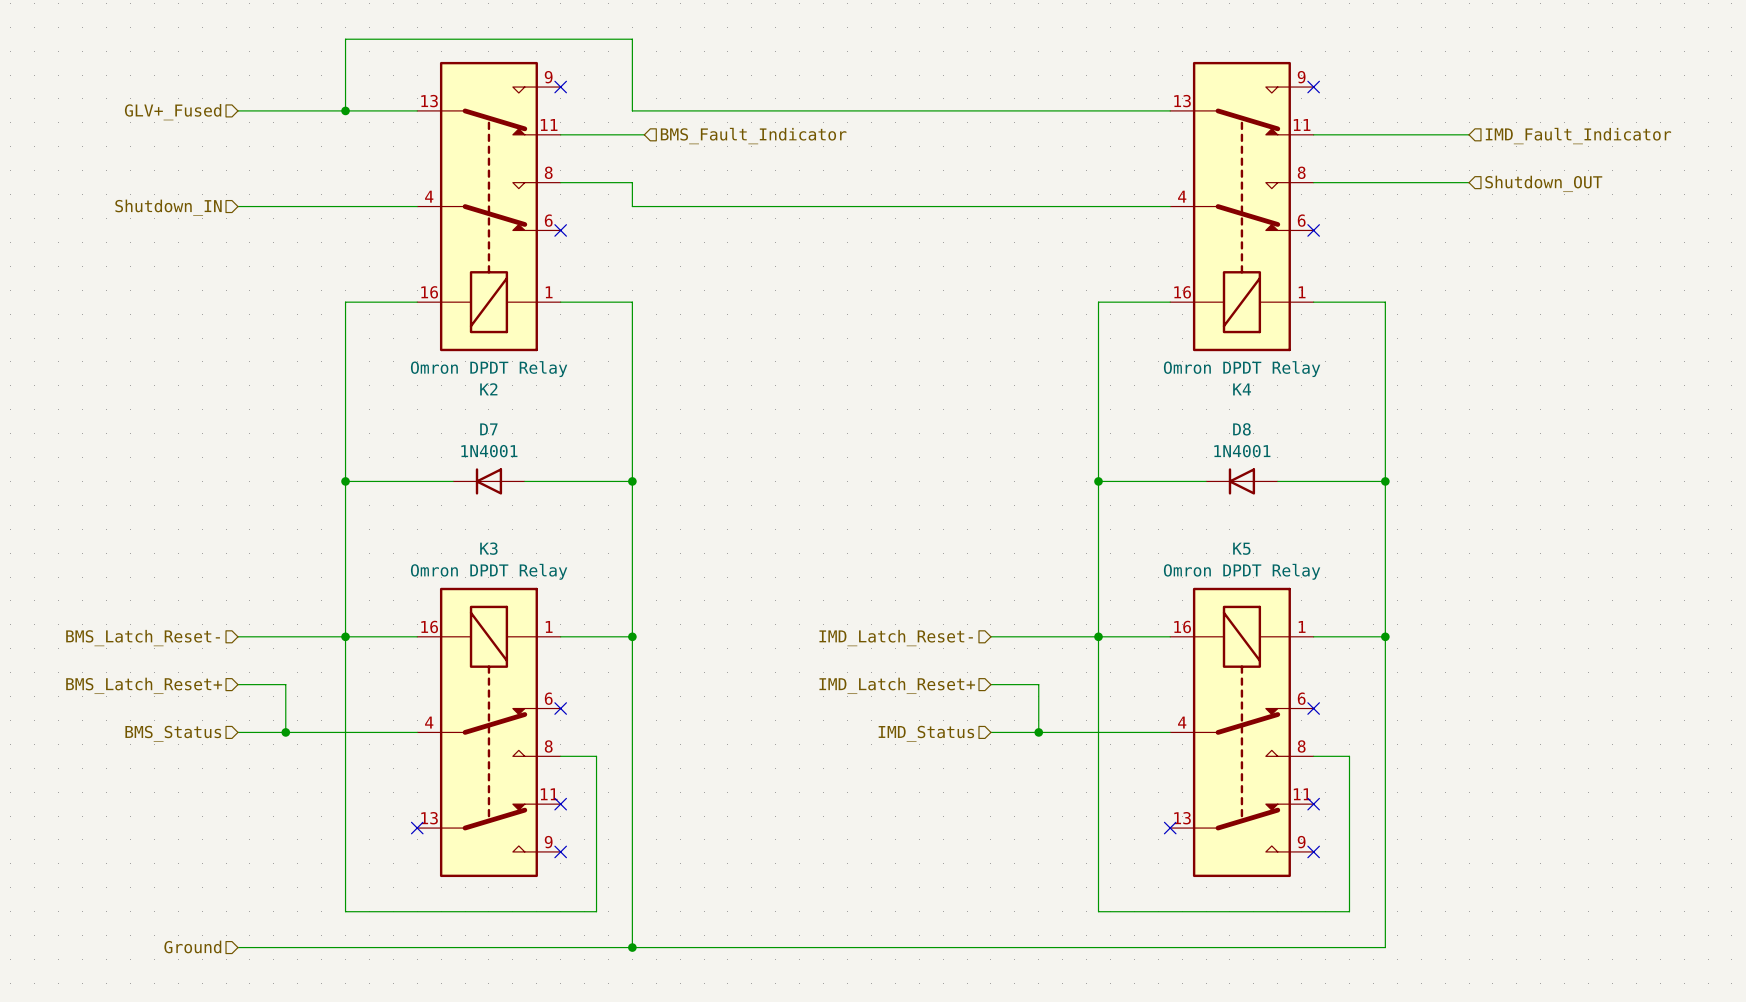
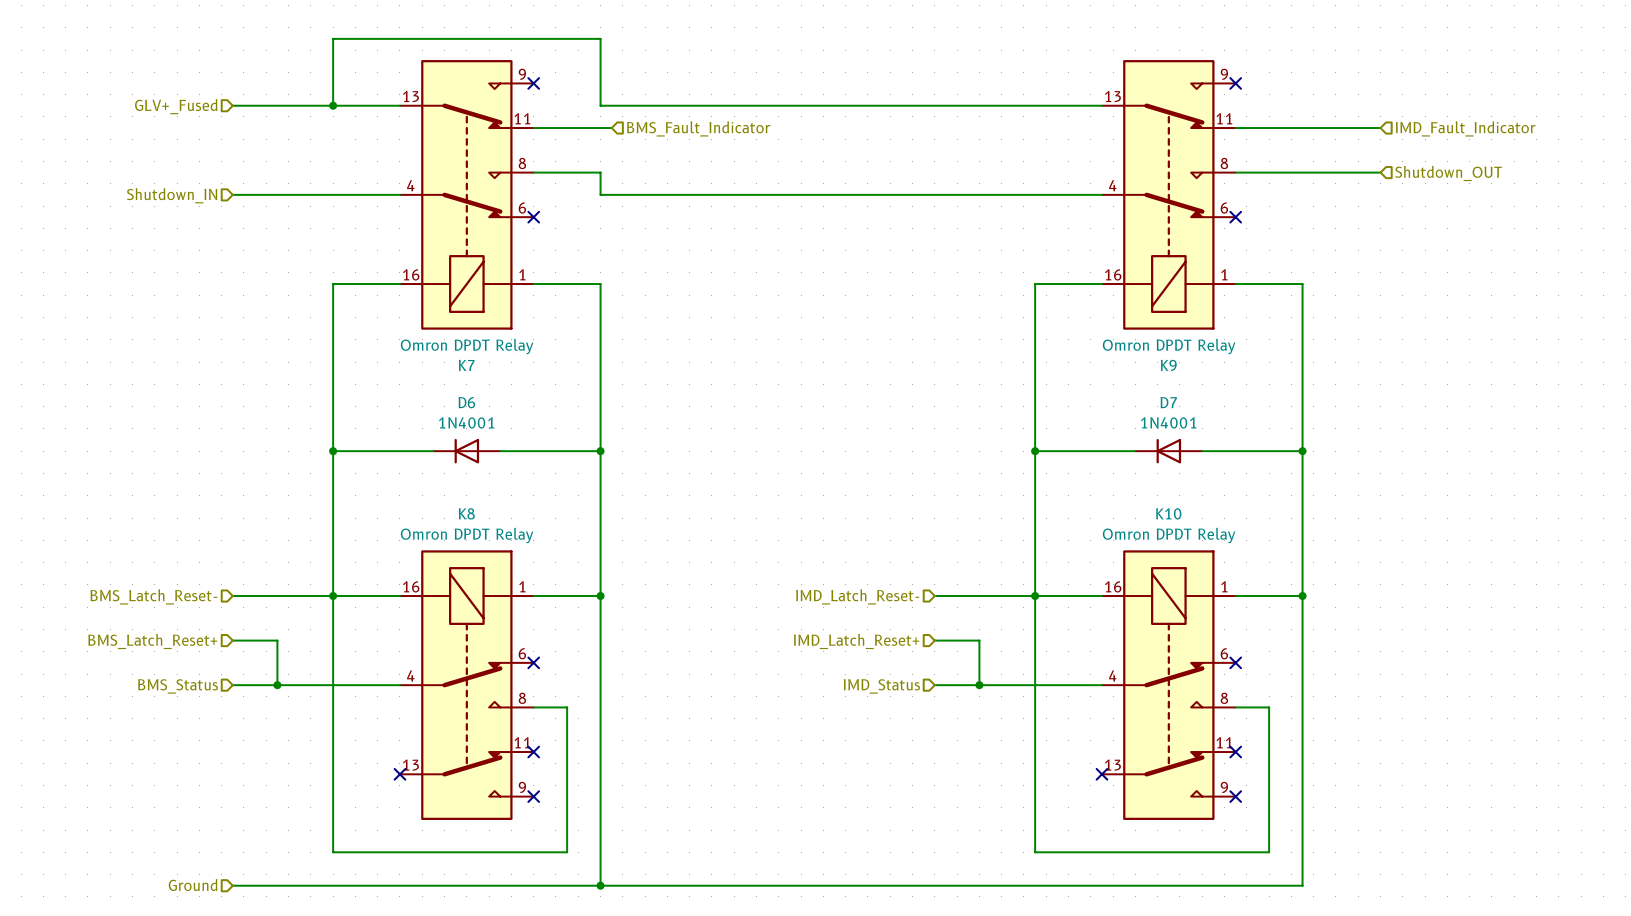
K2 name: K2 (488, 389) -> K7 (466, 365)
K4 name: K4 (1242, 389) -> K9 (1168, 365)
D7 name: D7 (488, 429) -> D6 (466, 402)
D8 name: D8 (1241, 429) -> D7 (1168, 402)
K3 name: K3 (488, 548) -> K8 (466, 513)
K5 name: K5 (1241, 548) -> K10 (1168, 513)

